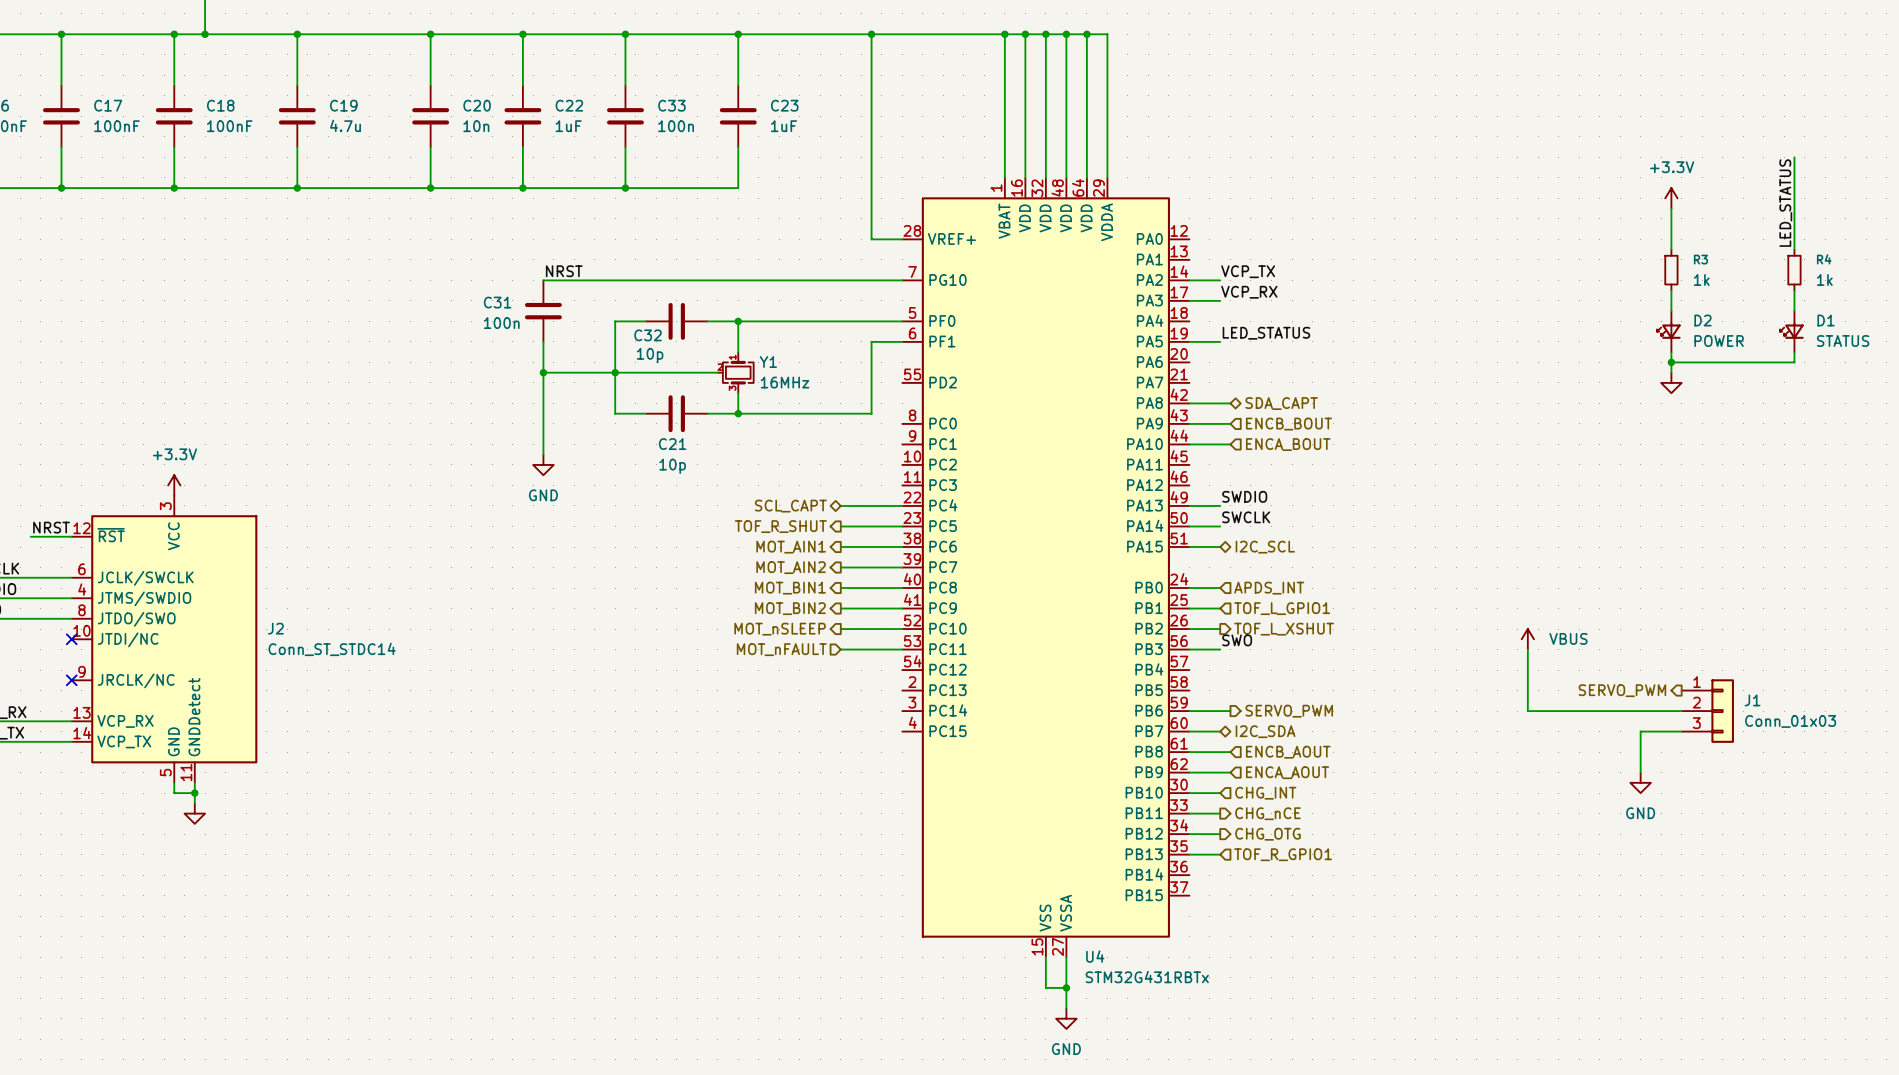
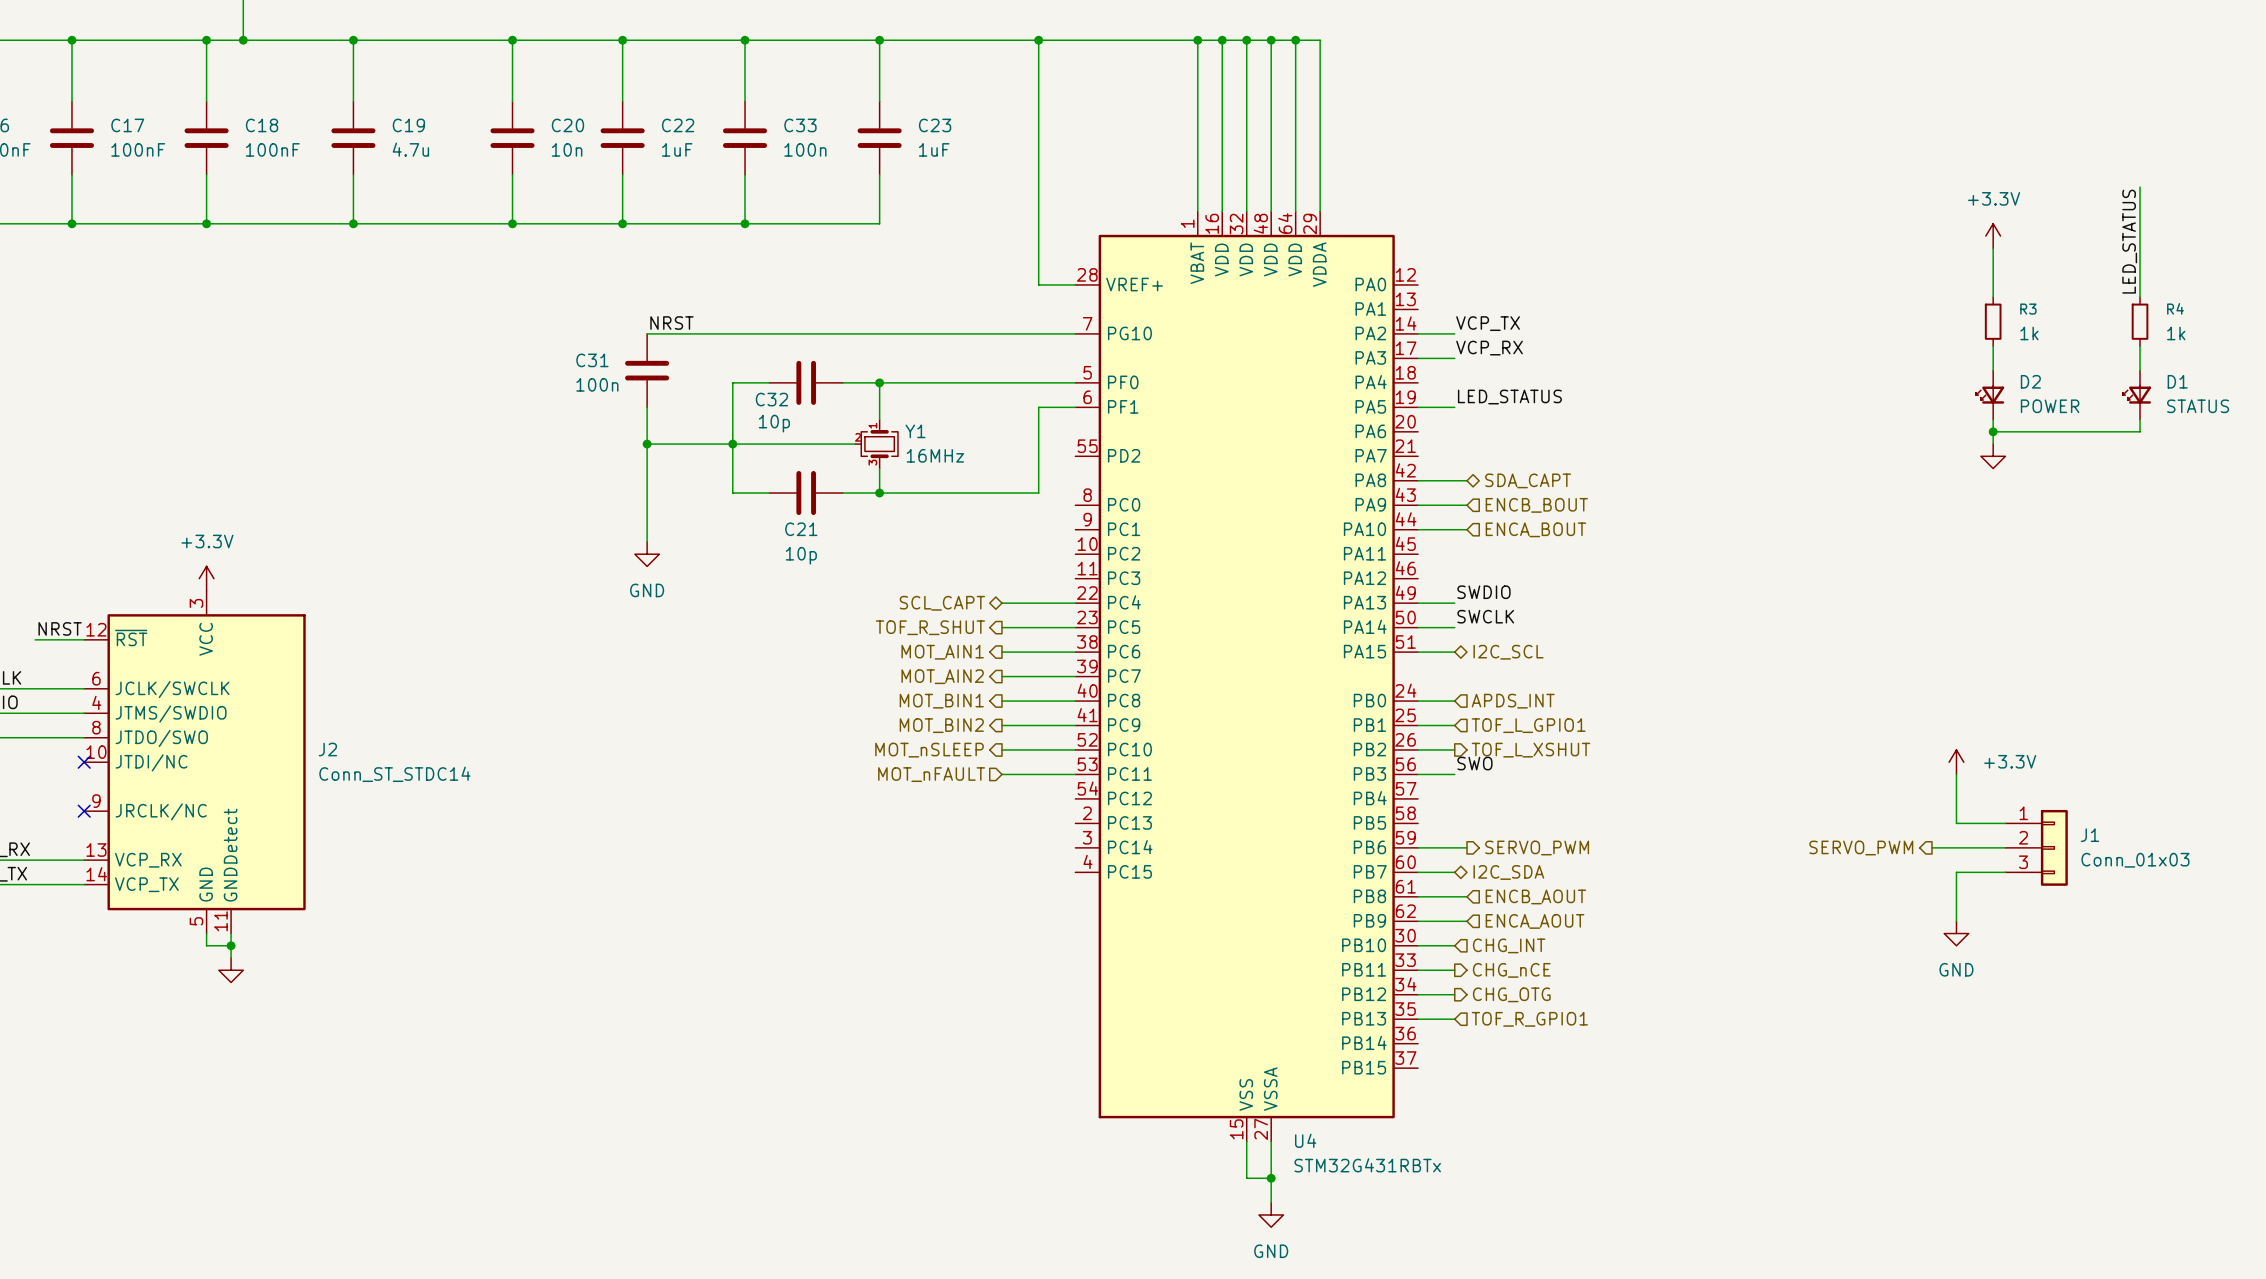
power symbol: VBUS (1527, 639) -> none
power symbol: none -> +3.3V (1956, 762)
wire: (1527, 649) (1527, 711) (1620, 711) -> none
wire: none -> (1956, 774) (1956, 823) (2005, 823)
hierarchical label position: SERVO_PWM (1622, 690) -> SERVO_PWM (1861, 848)

